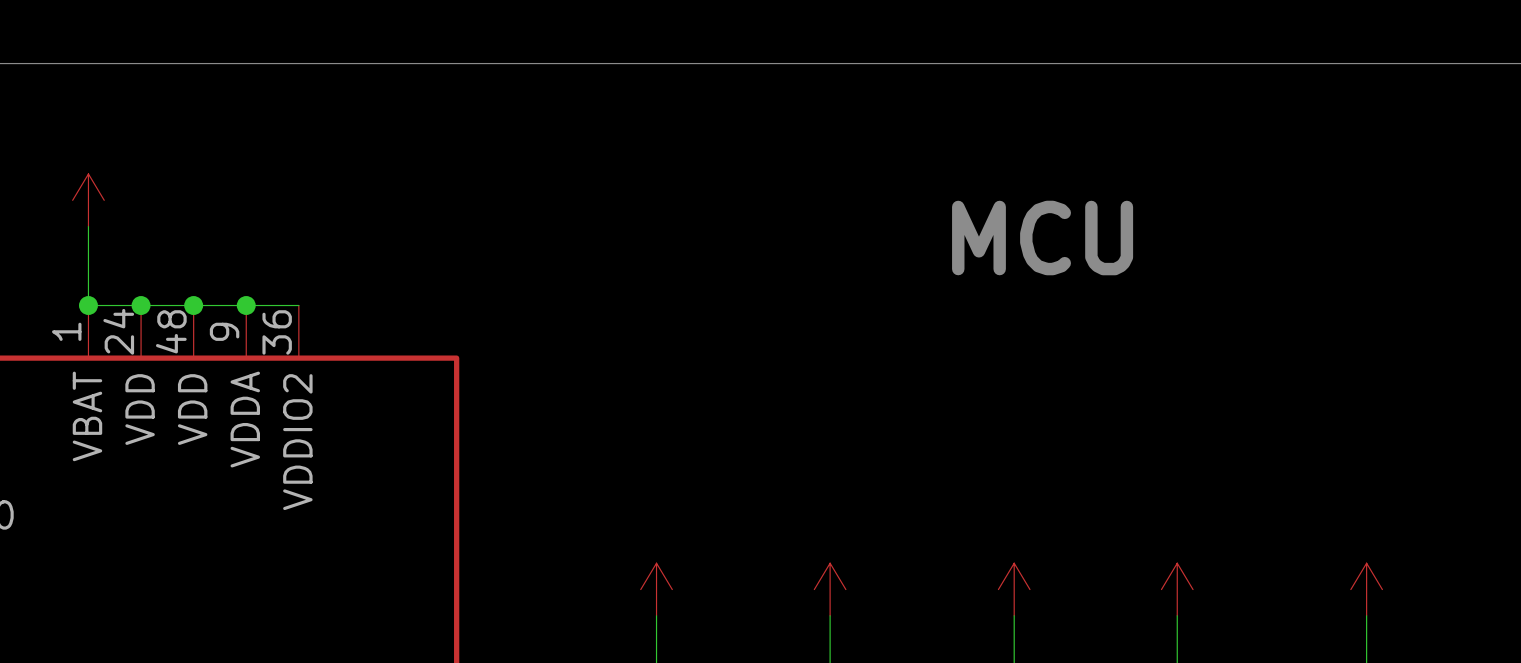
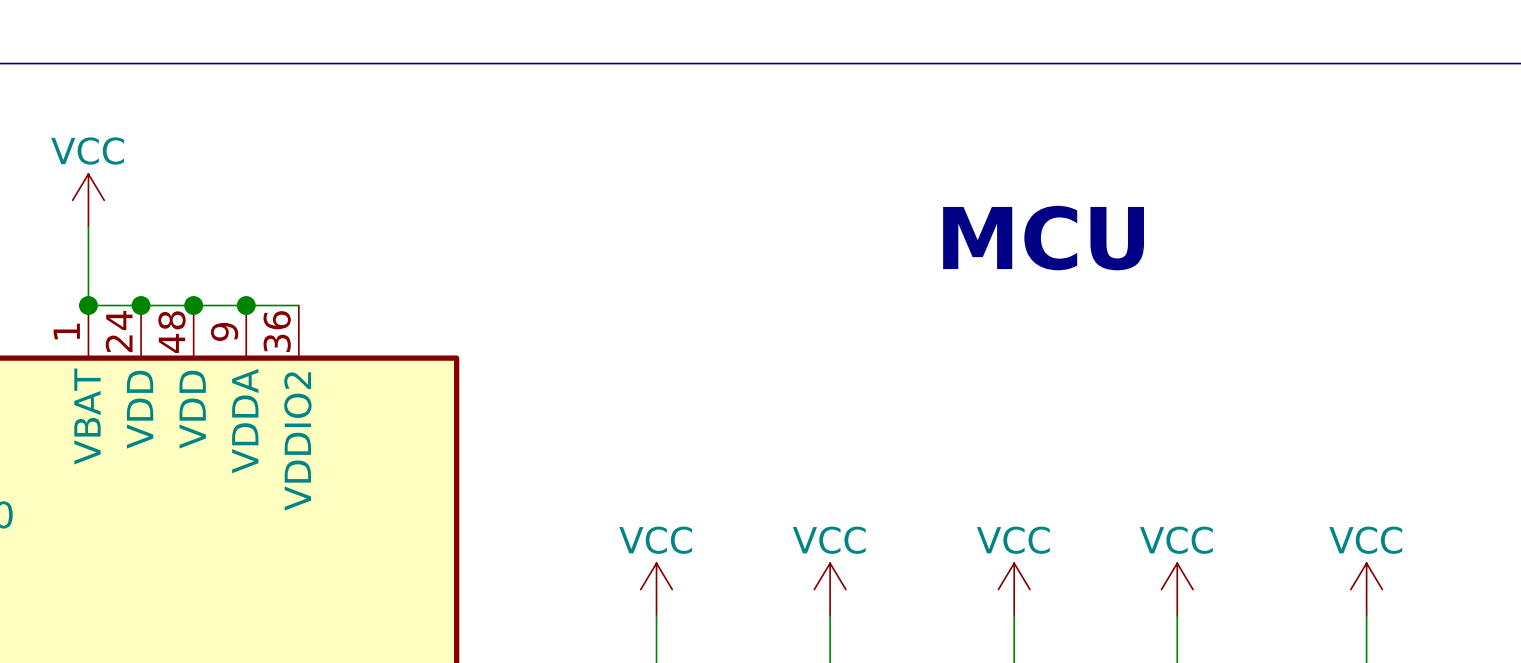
power symbol text: none -> VCC (87, 151)
power symbol text: none -> VCC (655, 540)
power symbol text: none -> VCC (829, 540)
power symbol text: none -> VCC (1013, 540)
power symbol text: none -> VCC (1176, 540)
power symbol text: none -> VCC (1365, 540)

